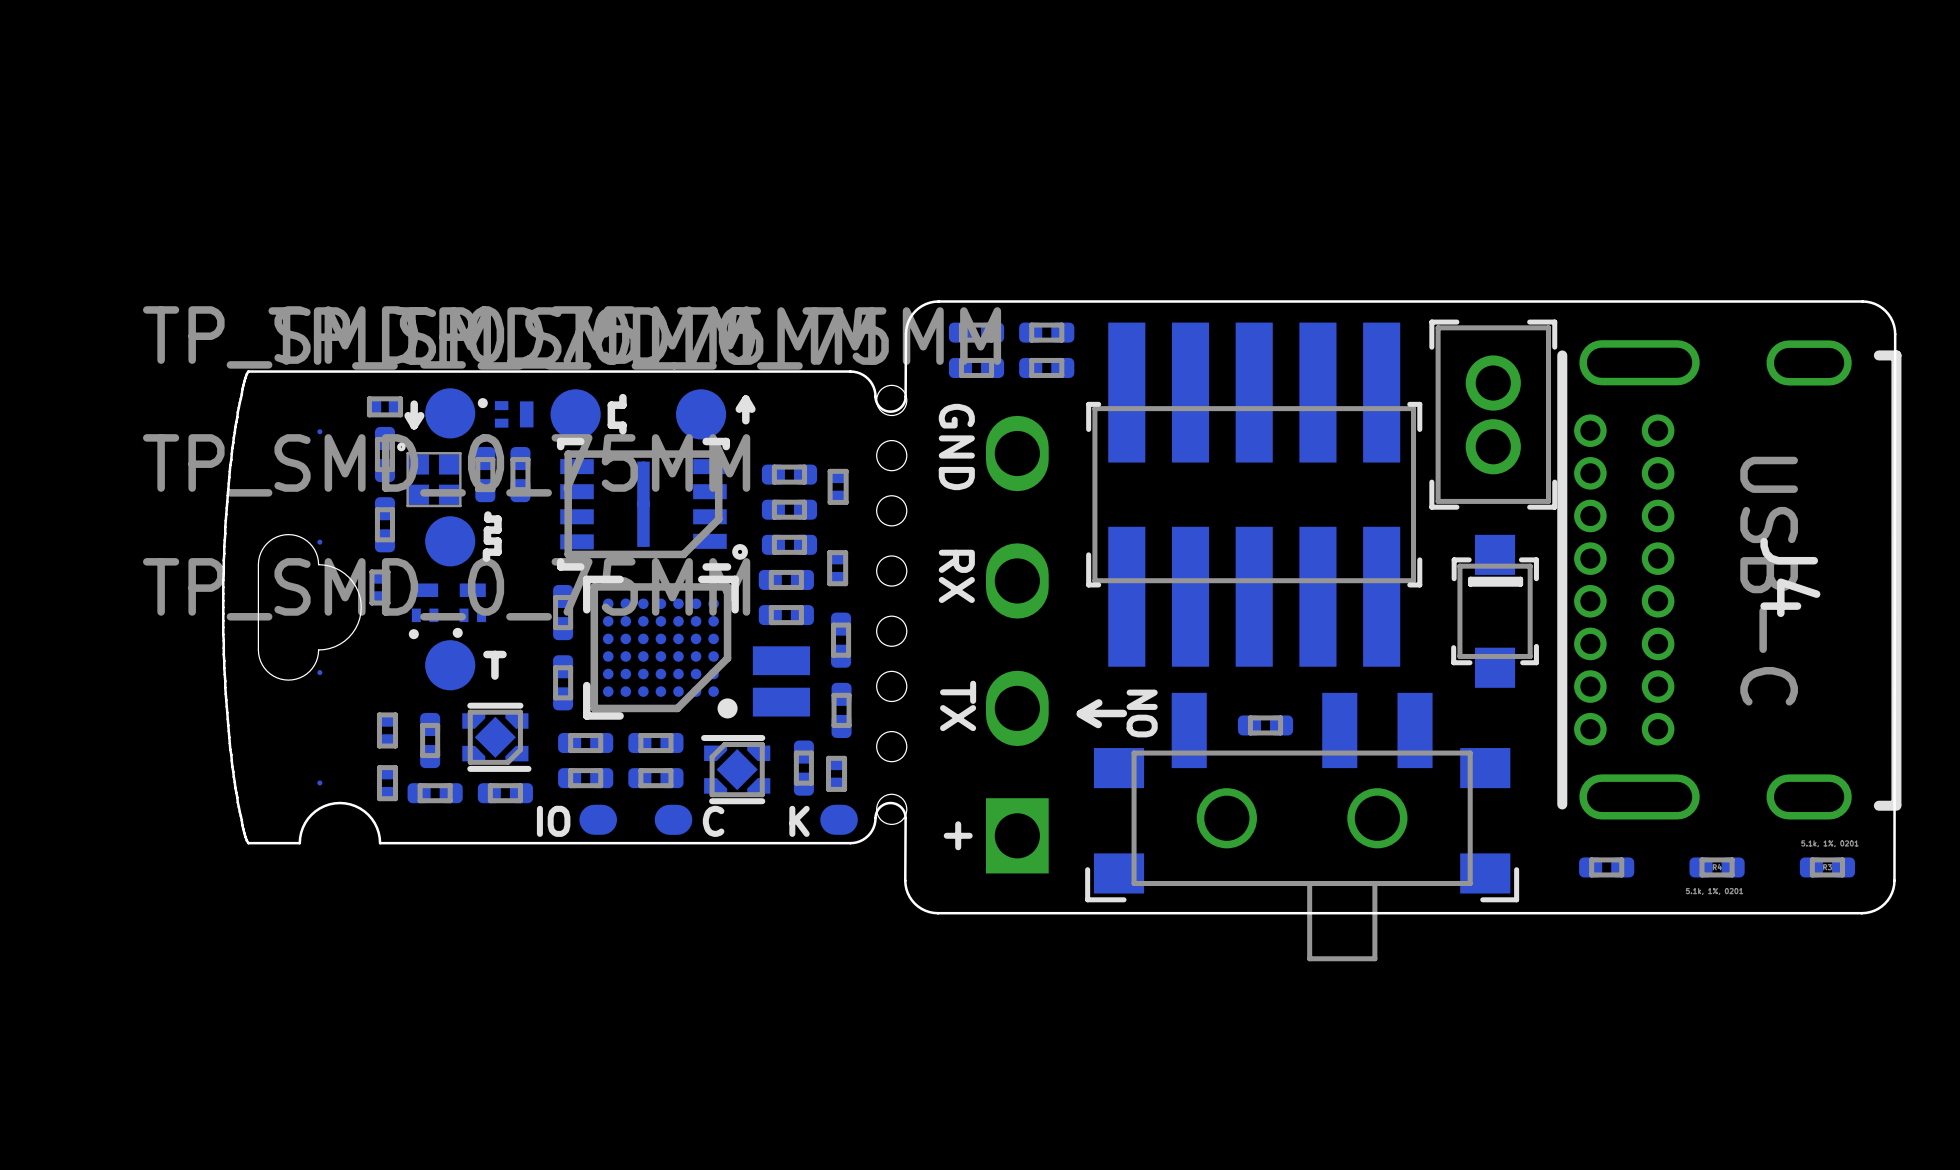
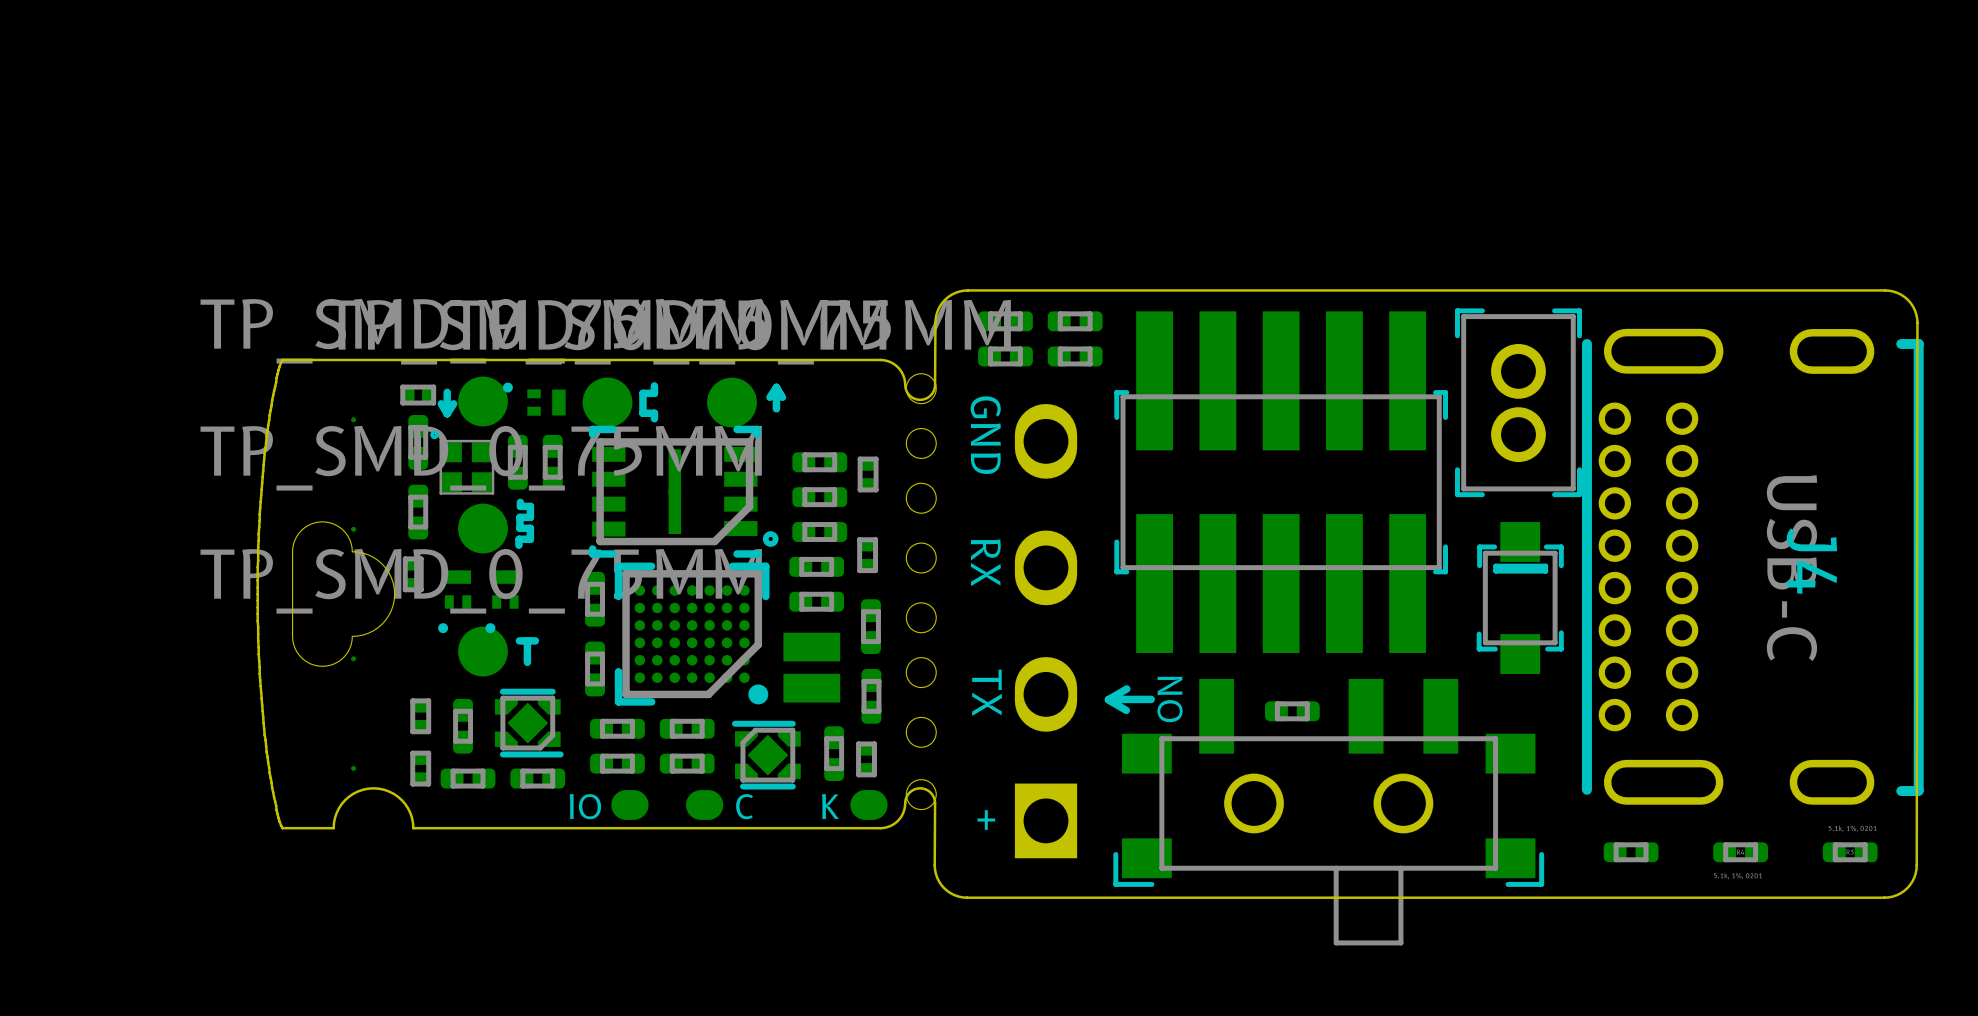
part footprint: [477, 398, 534, 428] -> [502, 382, 566, 416]
part footprint: [408, 583, 439, 640] -> [438, 570, 472, 634]
part footprint: [452, 583, 487, 638] -> [485, 570, 519, 634]

